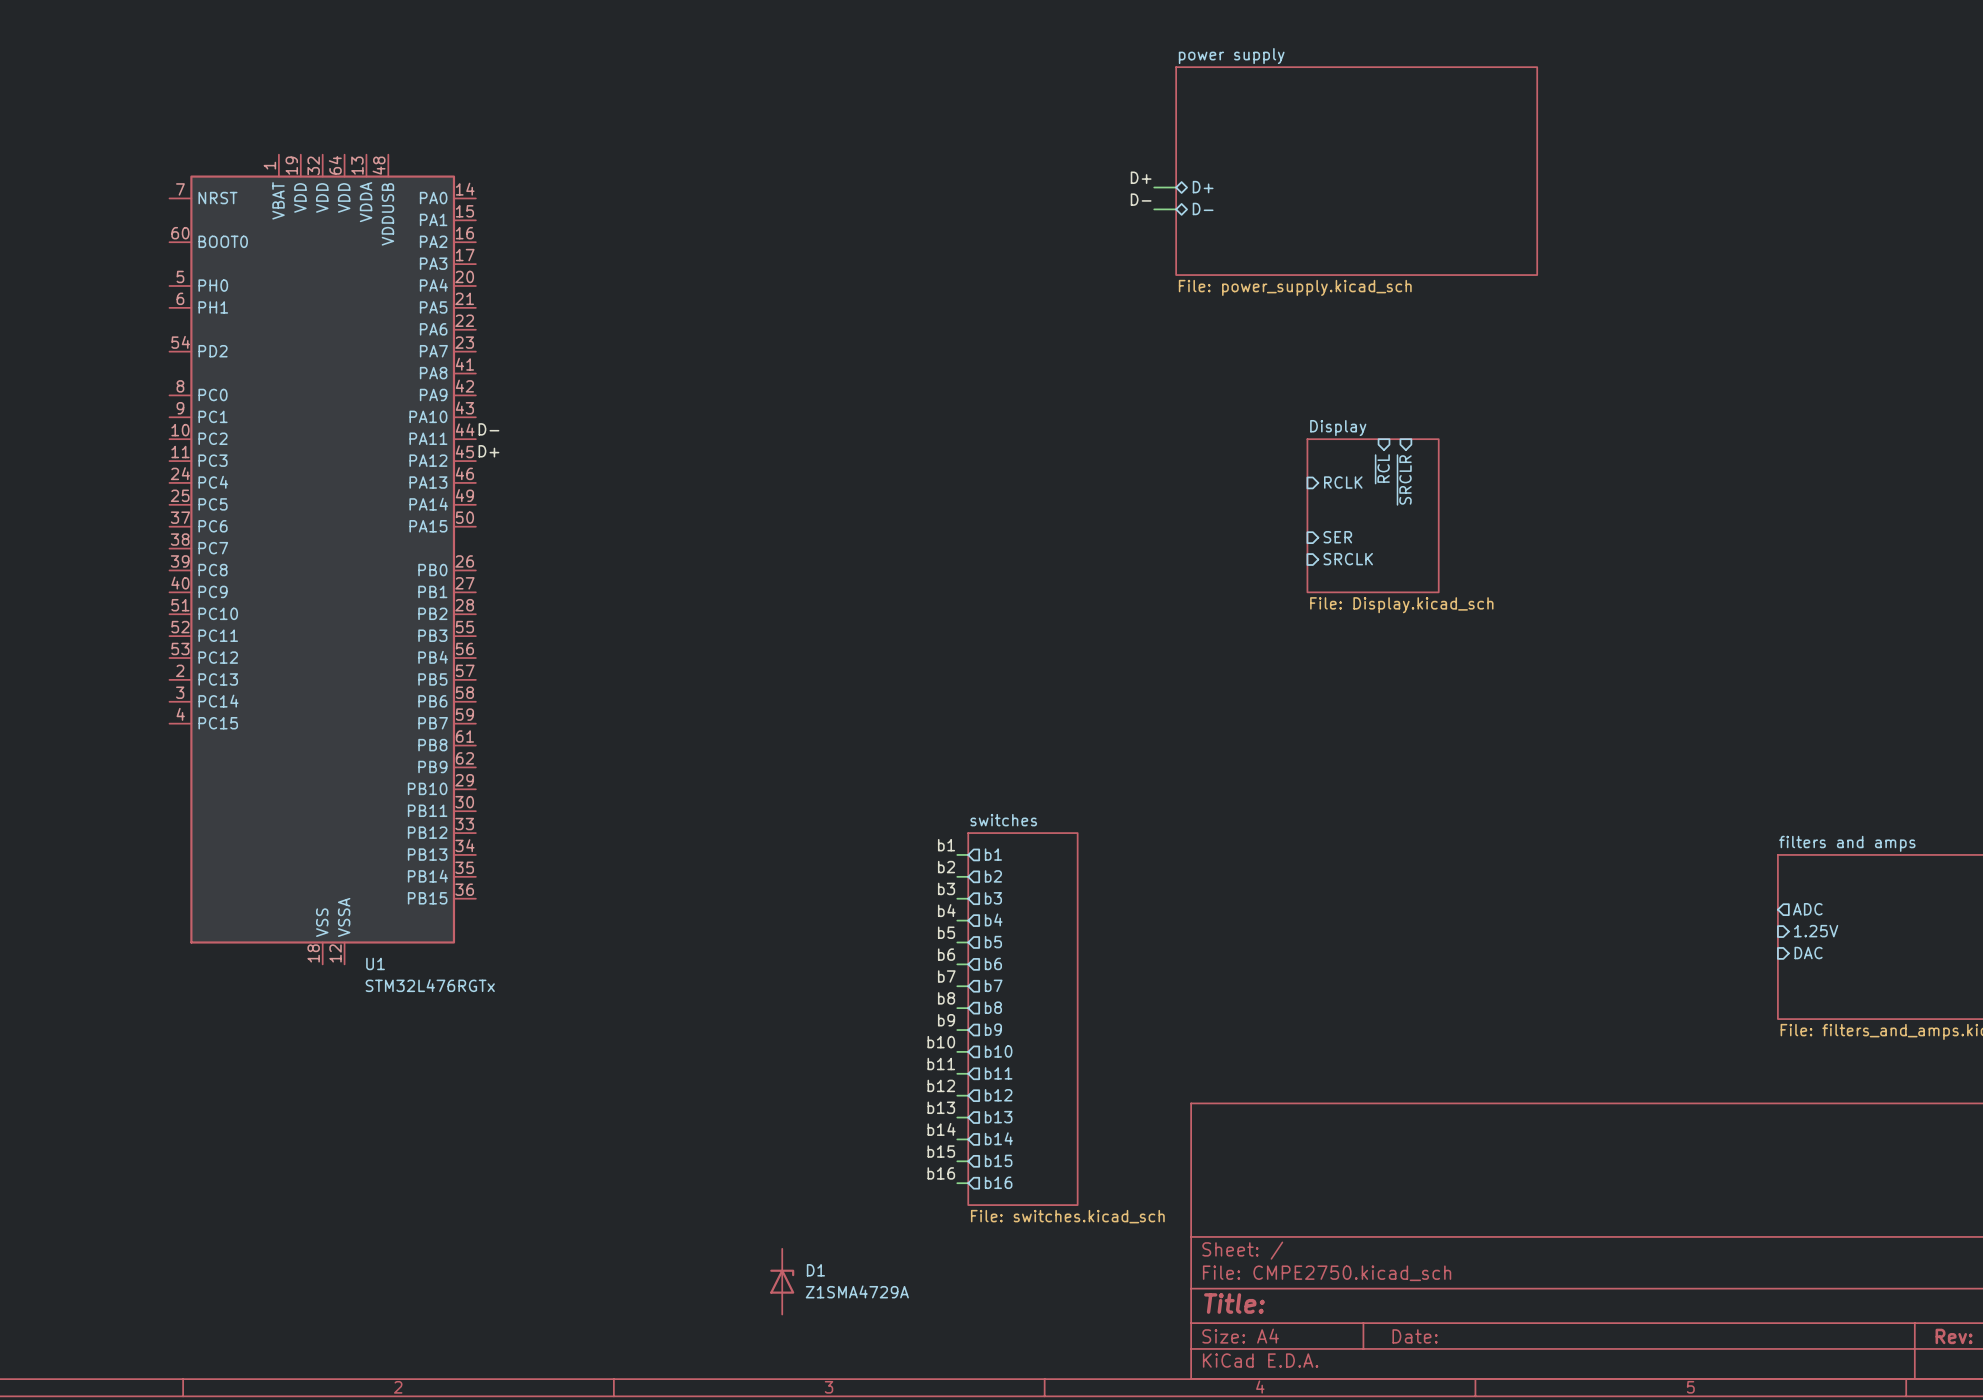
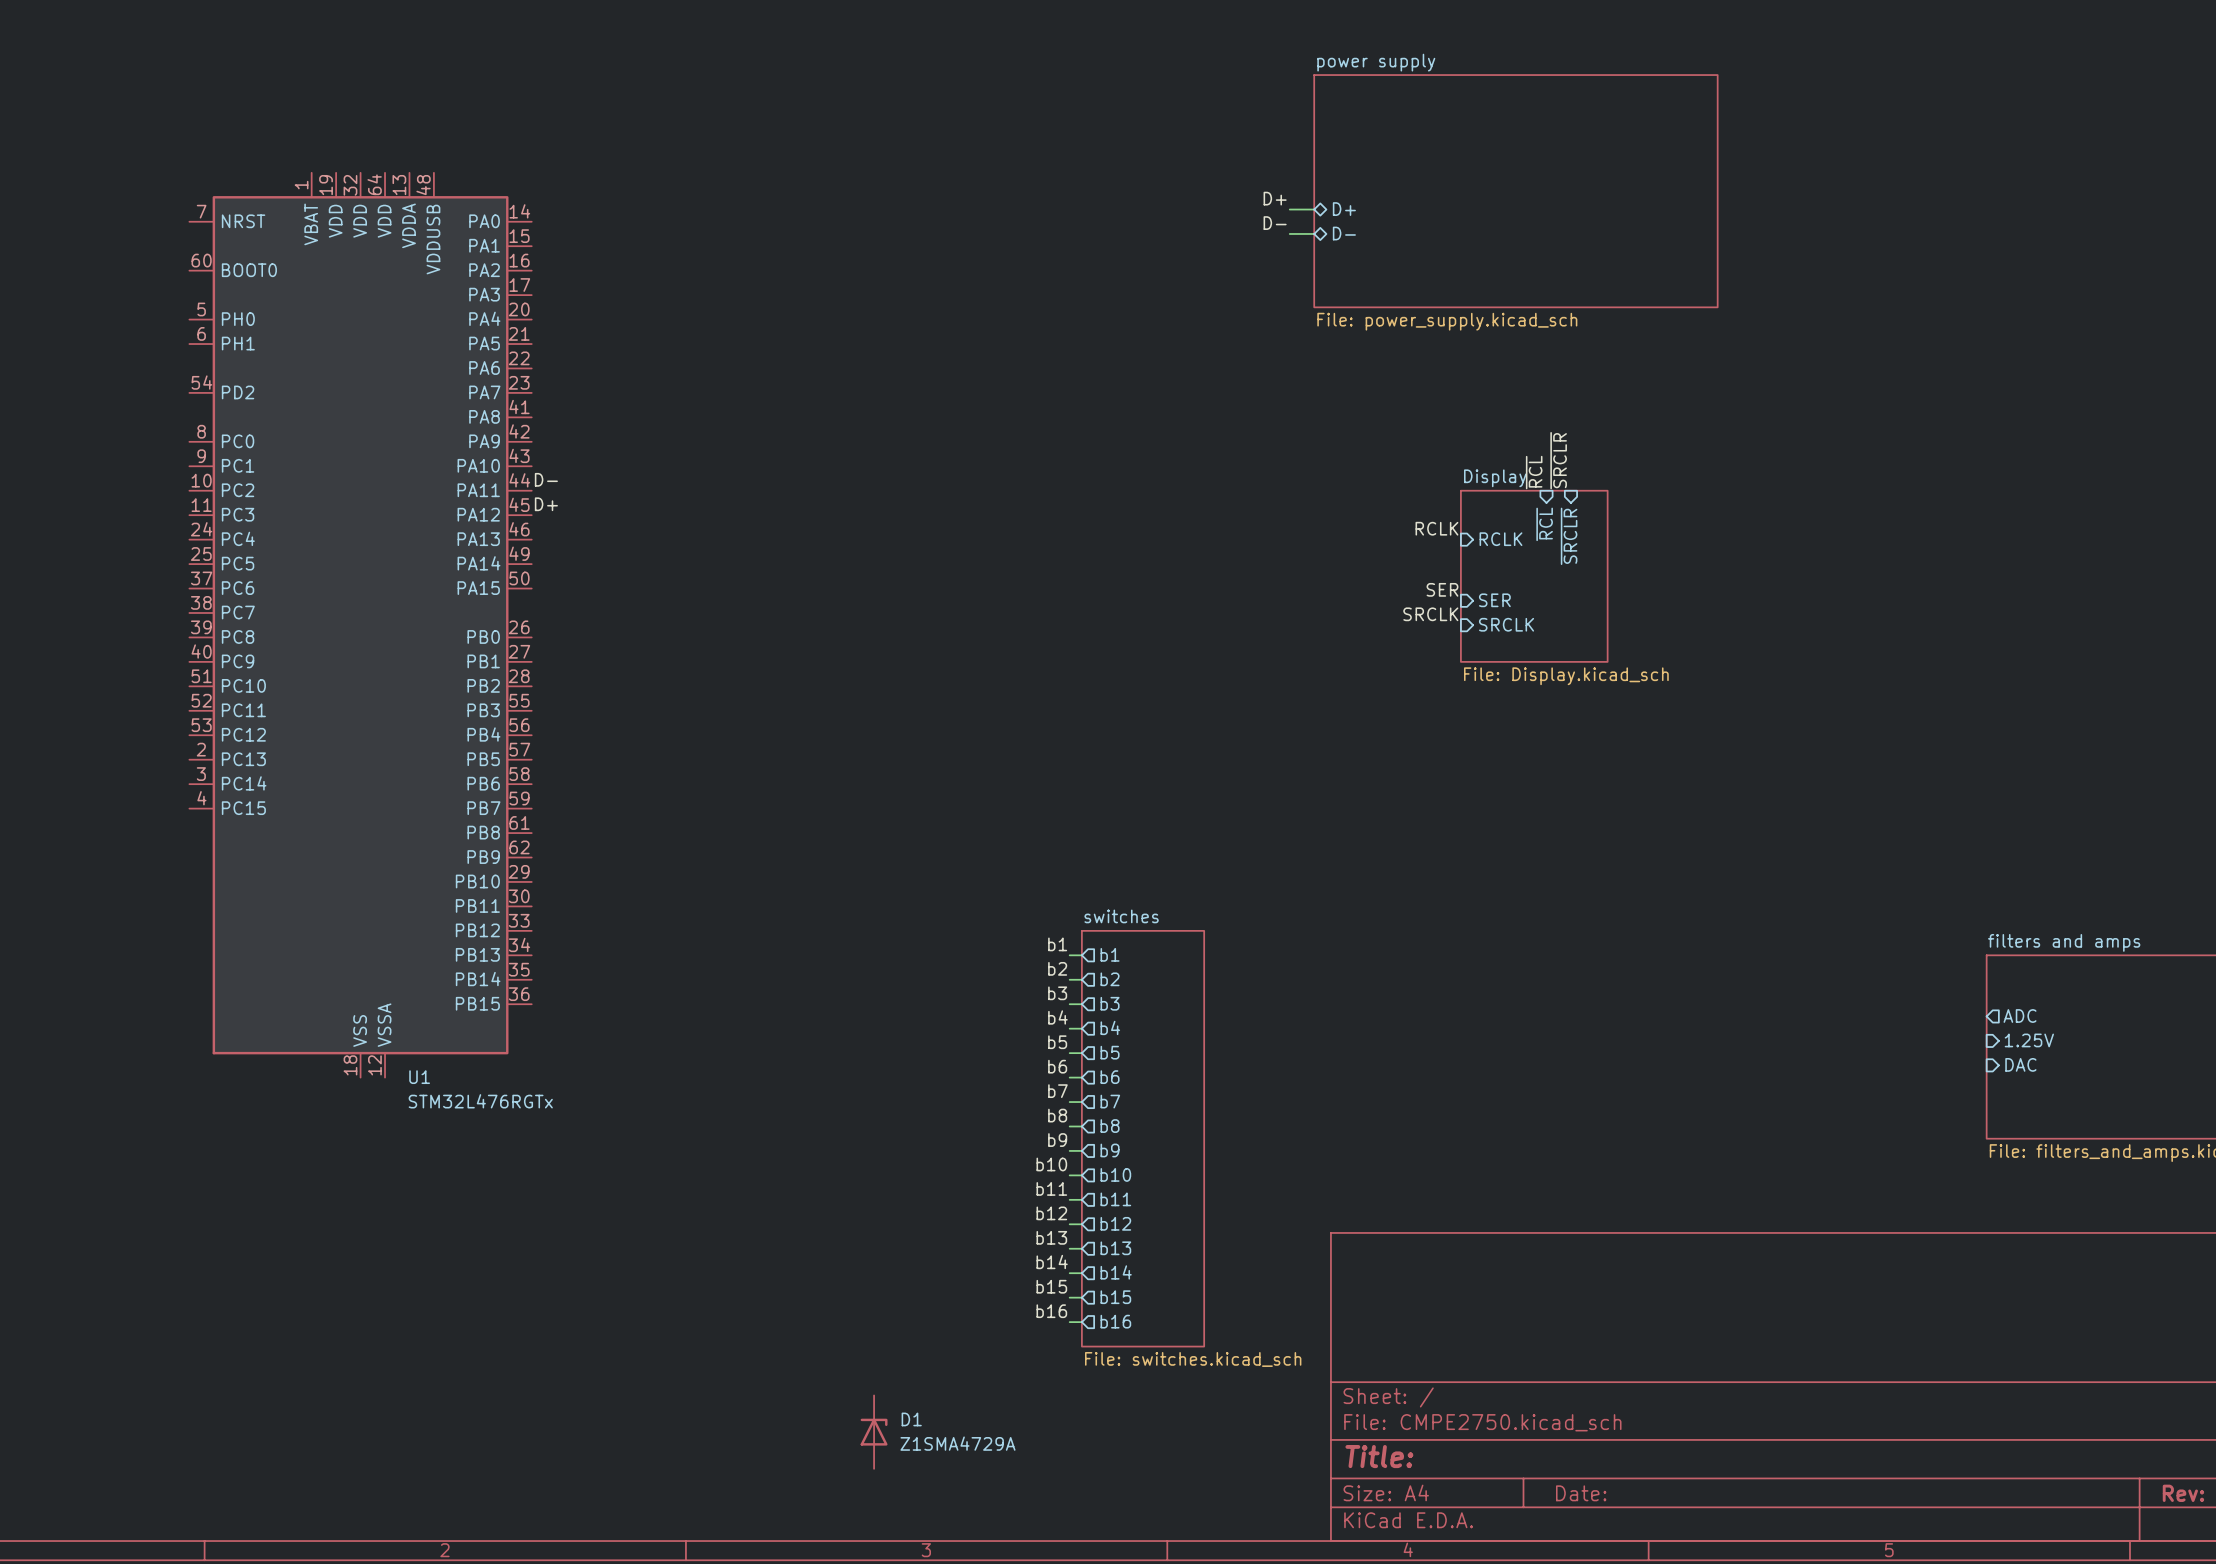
label: none -> ~{SRCLR} (1558, 460)
label: none -> ~{RCL} (1534, 472)
label: none -> RCLK (1436, 528)
label: none -> SER (1442, 589)
label: none -> SRCLK (1430, 614)

